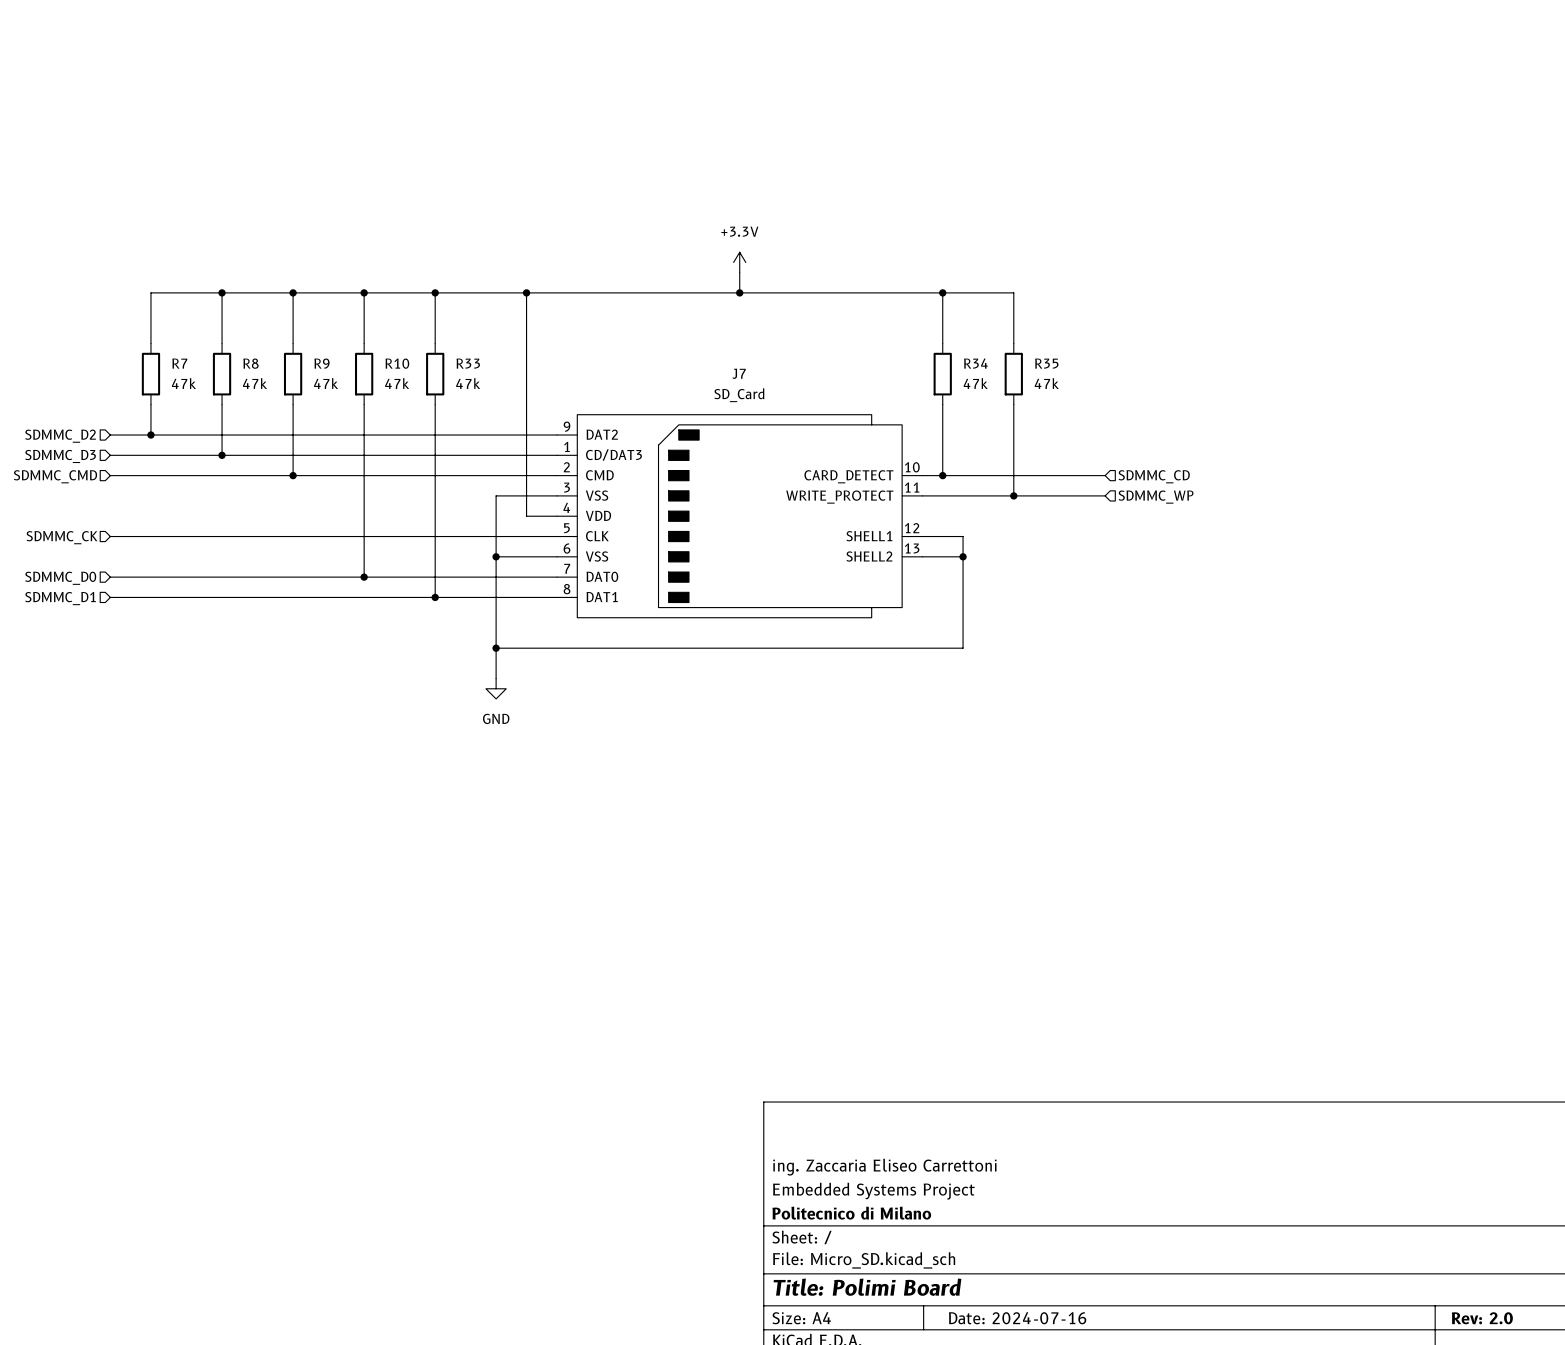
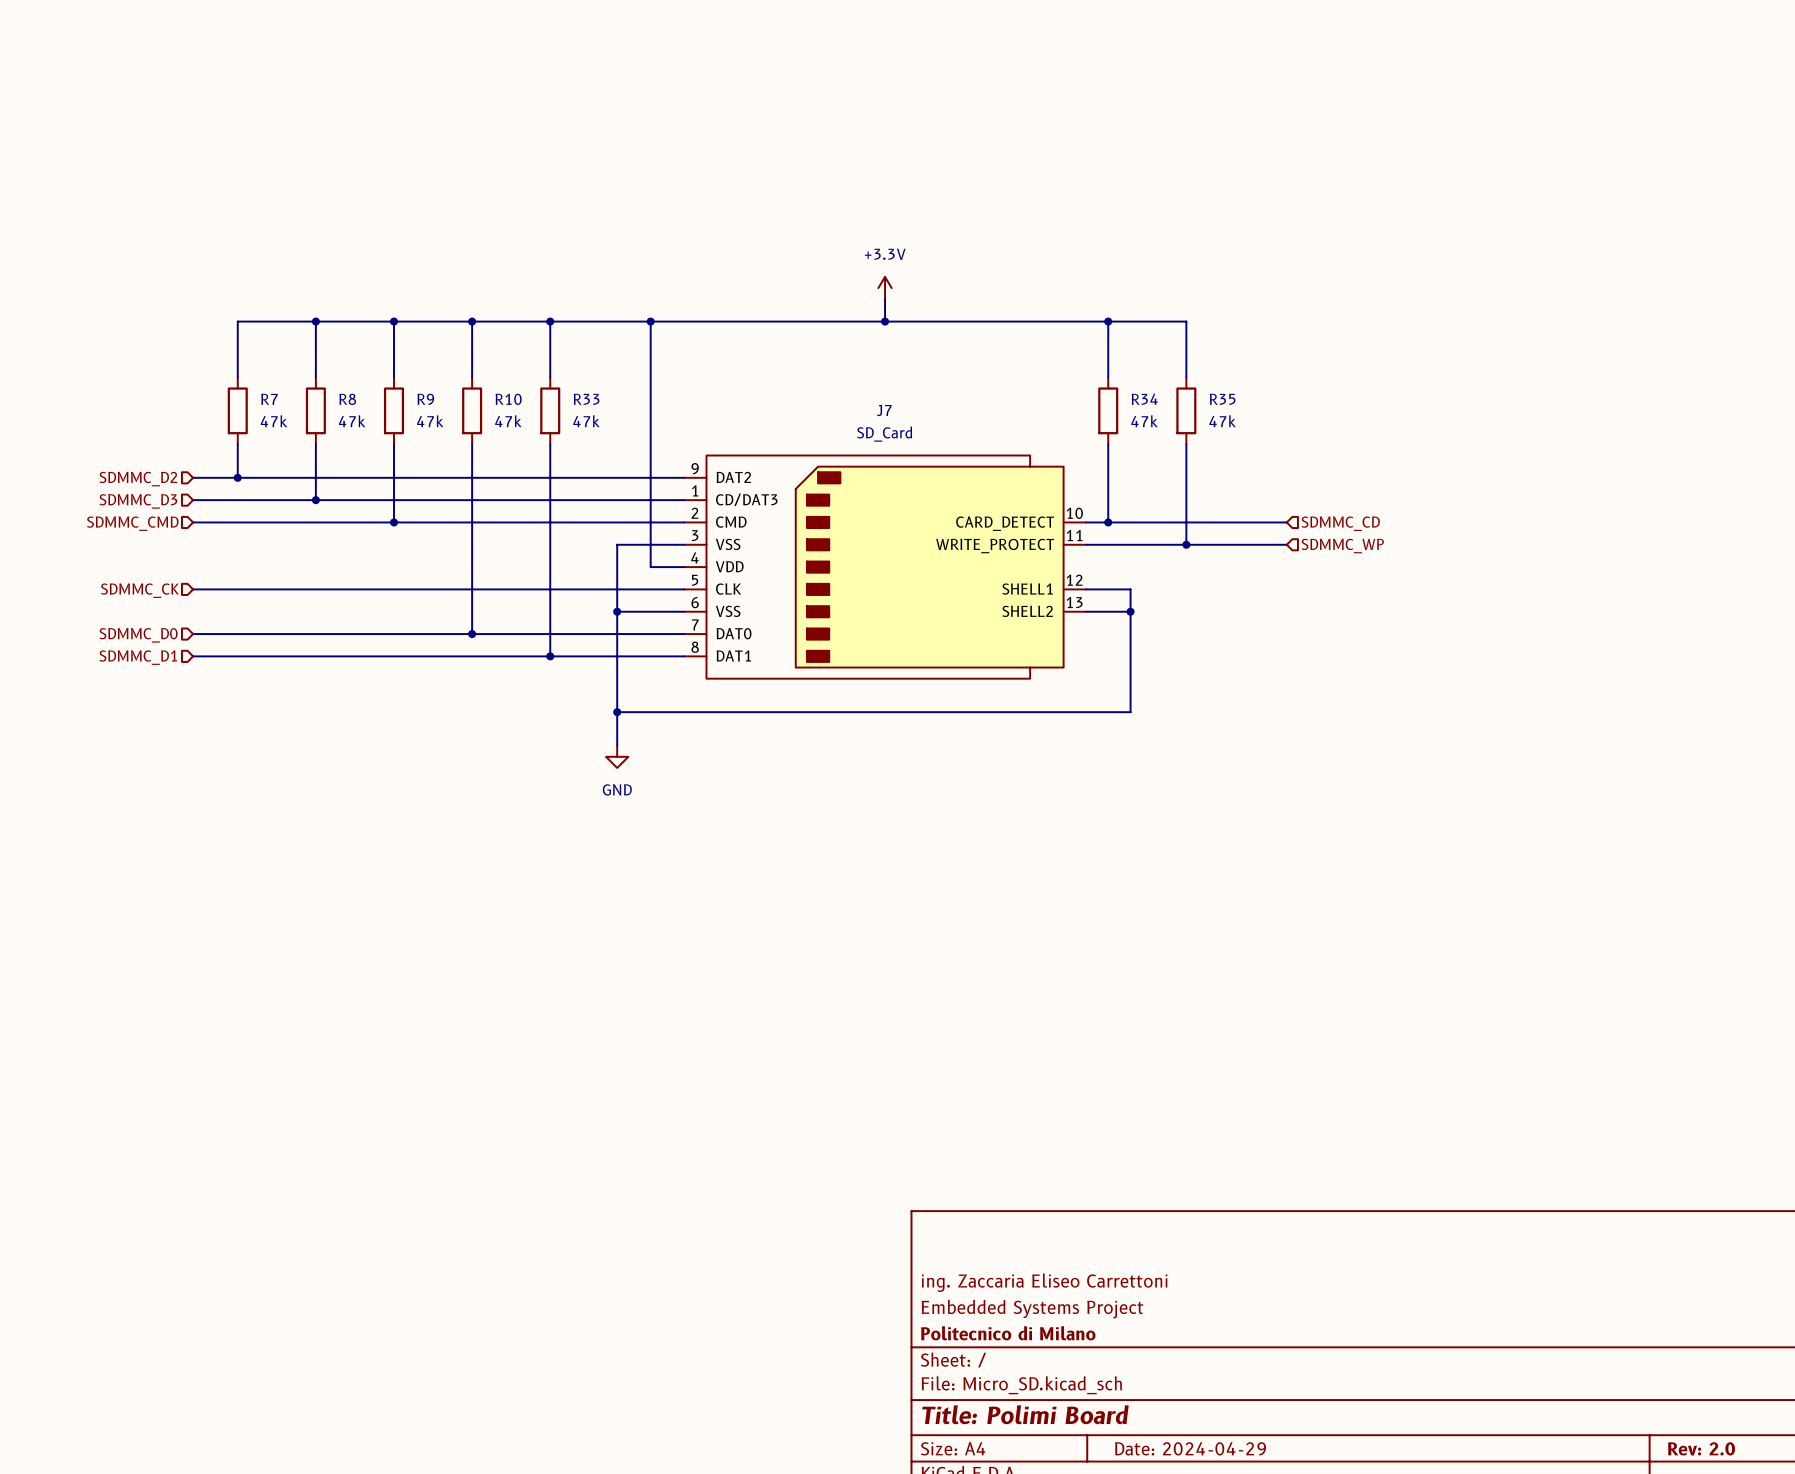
title block: Date: 2024-07-16 (1017, 1318) -> Date: 2024-04-29 (1190, 1448)

